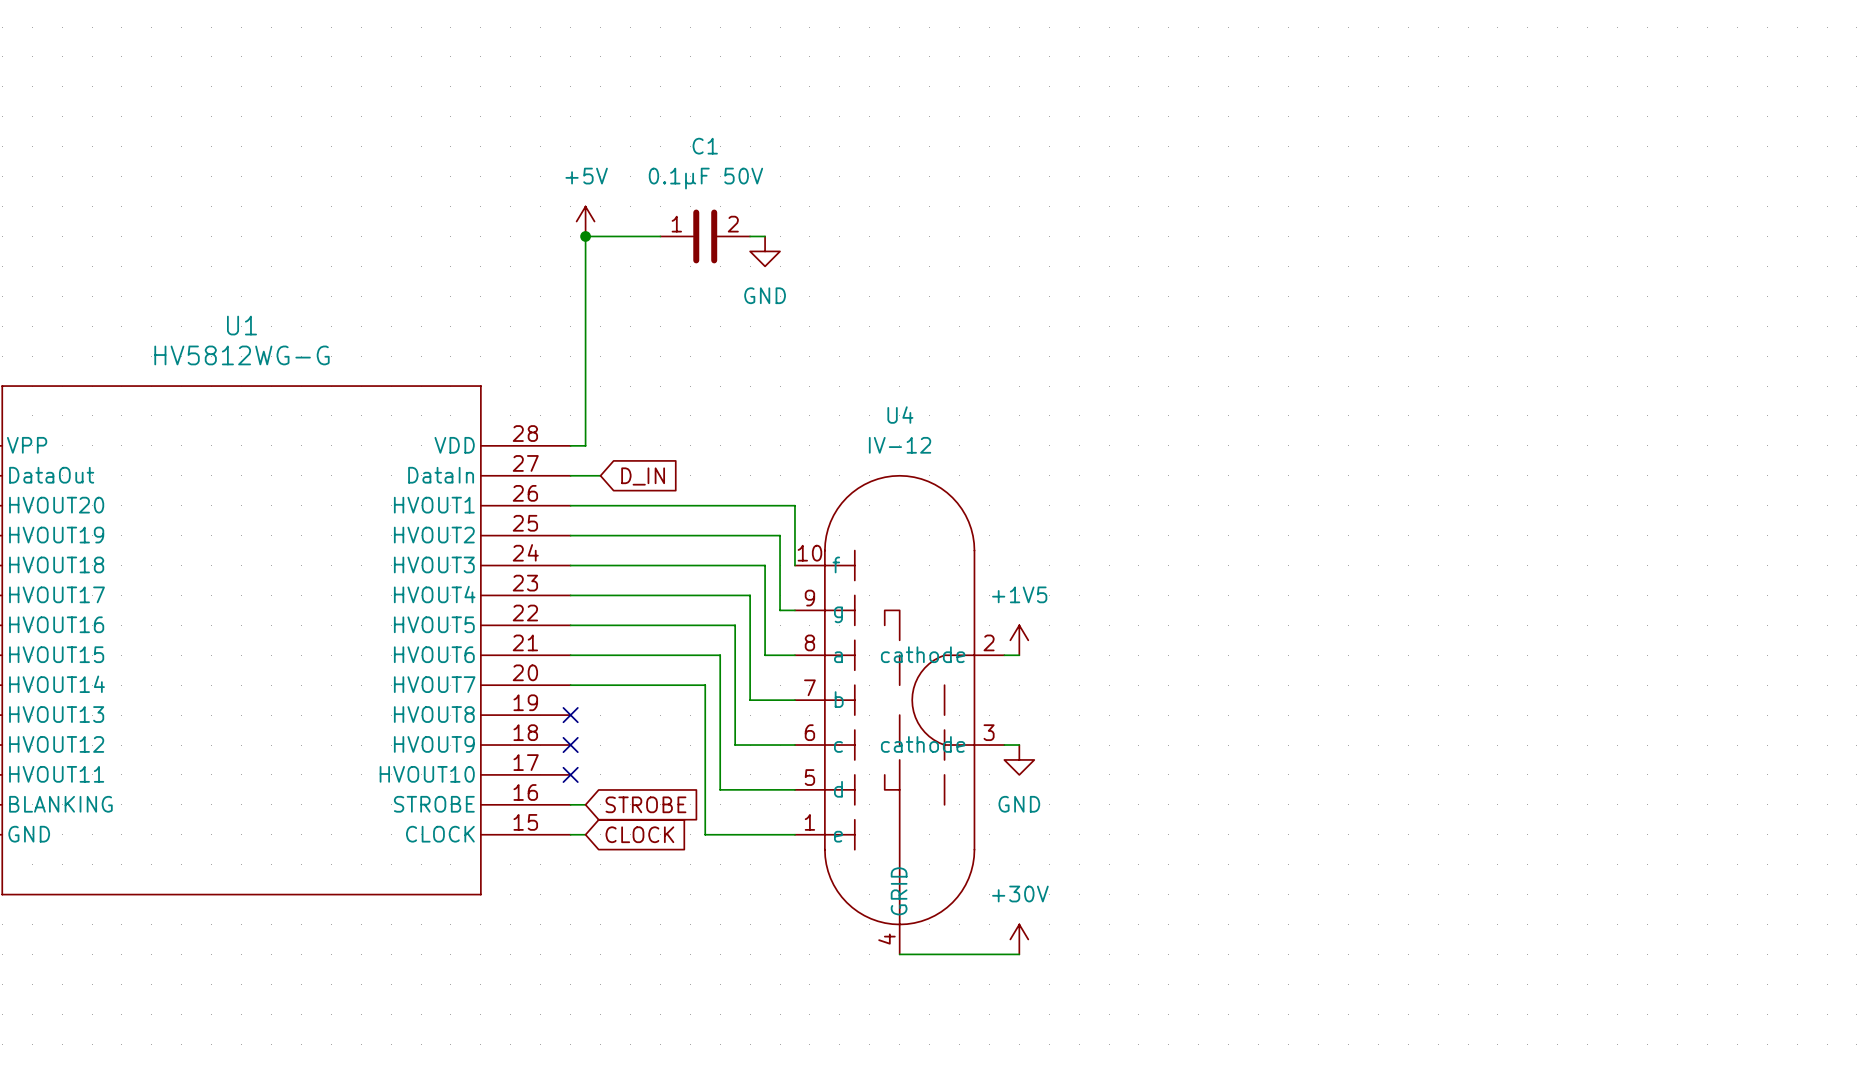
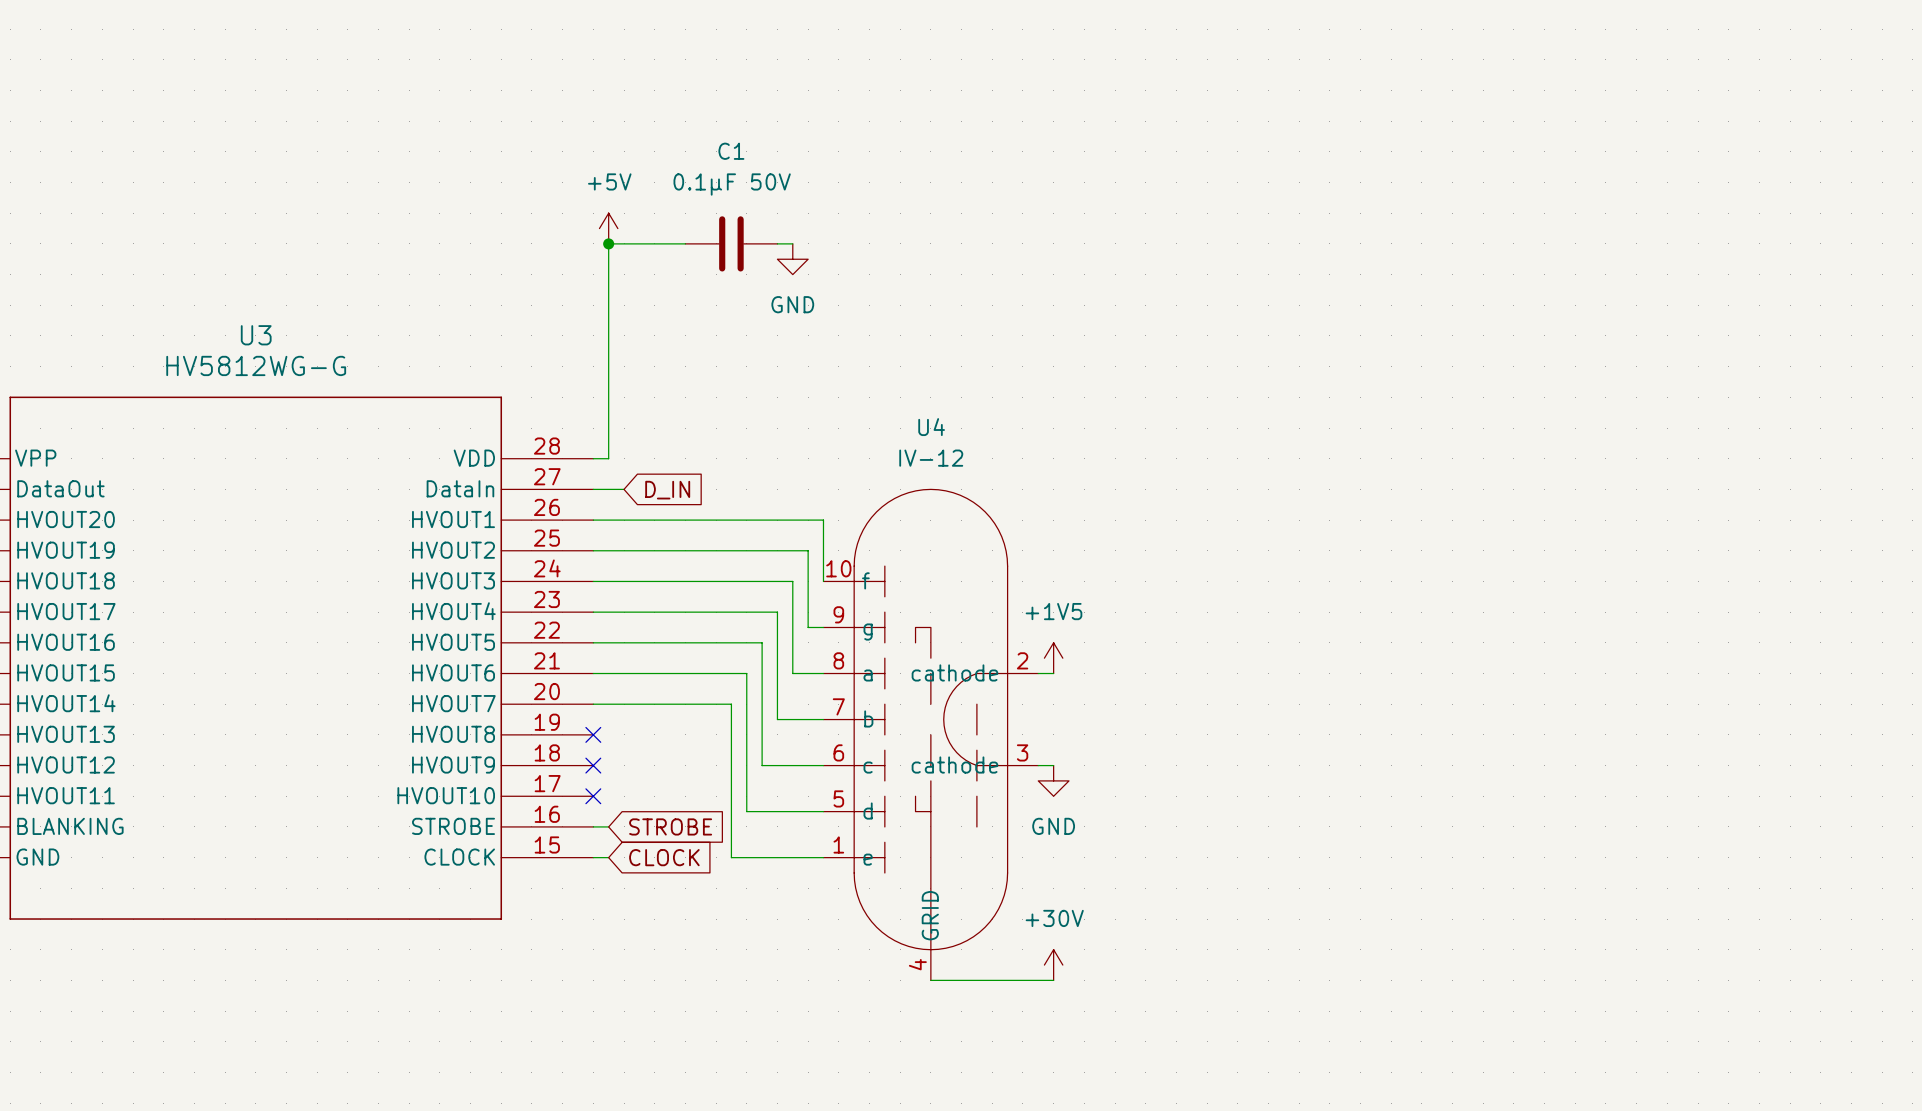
C1 pin number: 1 (676, 224) -> none
C1 pin number: 2 (733, 224) -> none
U1 name: U1 (242, 325) -> U3 (256, 335)

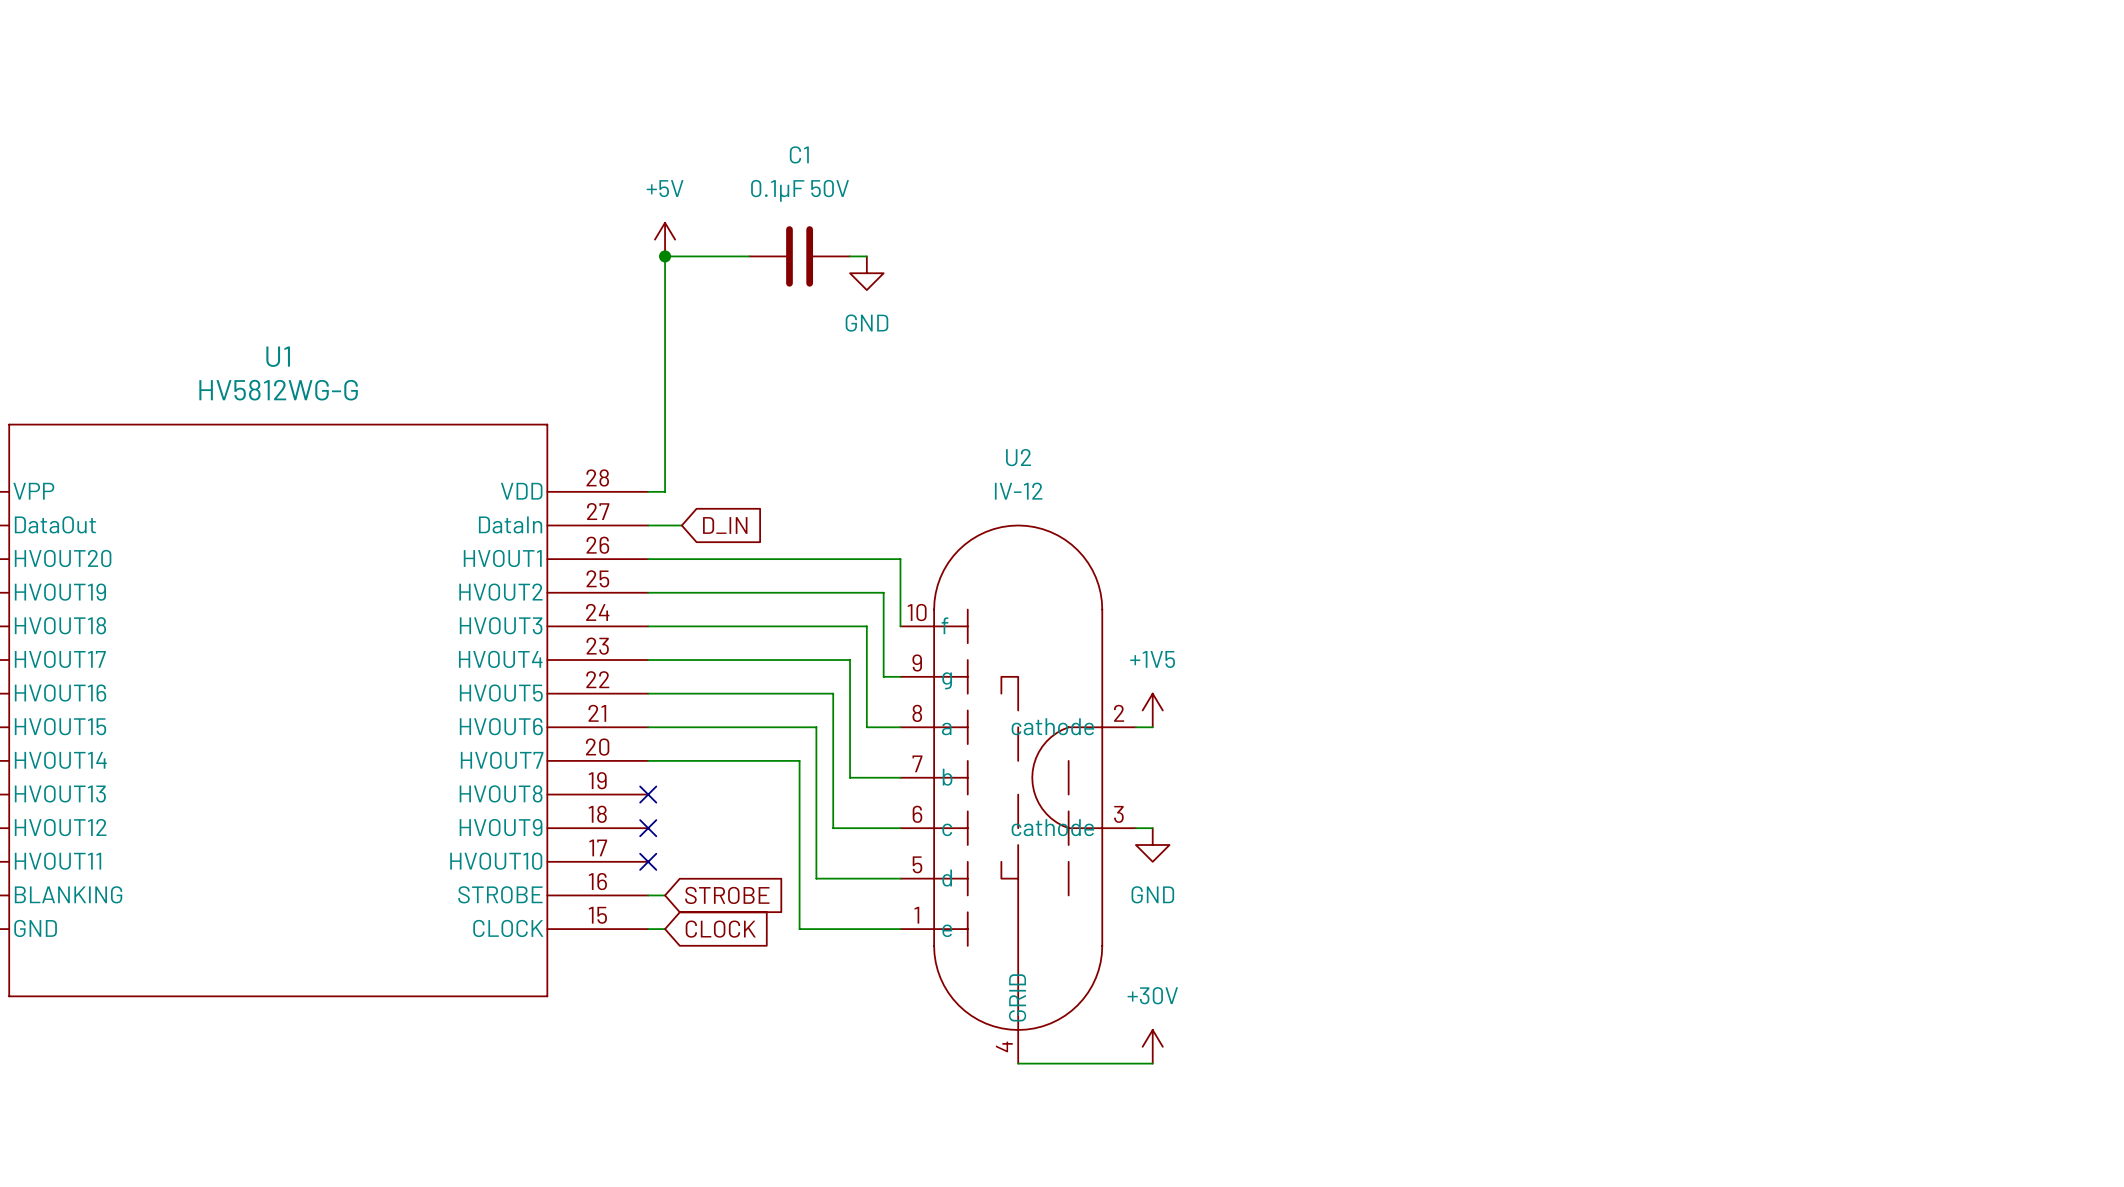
U3 name: U3 (256, 335) -> U1 (278, 356)
U4 name: U4 (931, 427) -> U2 (1018, 457)

